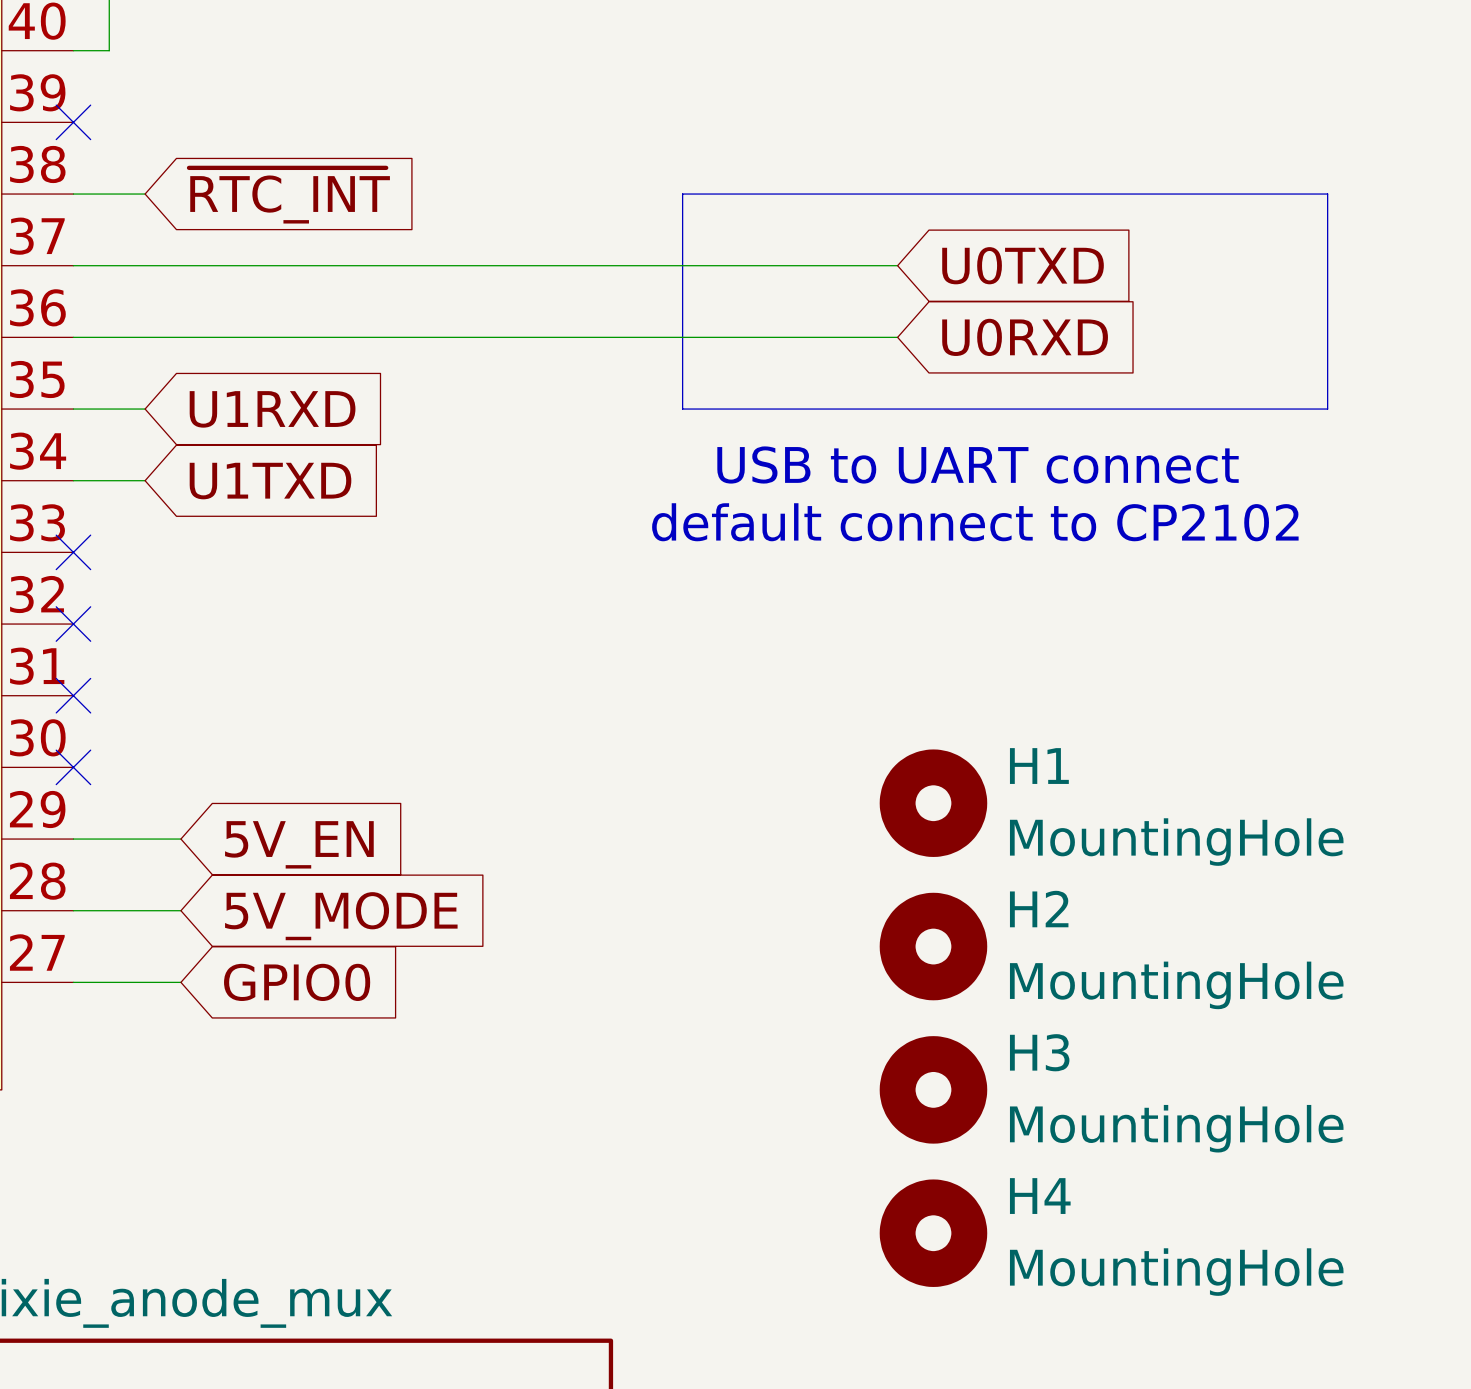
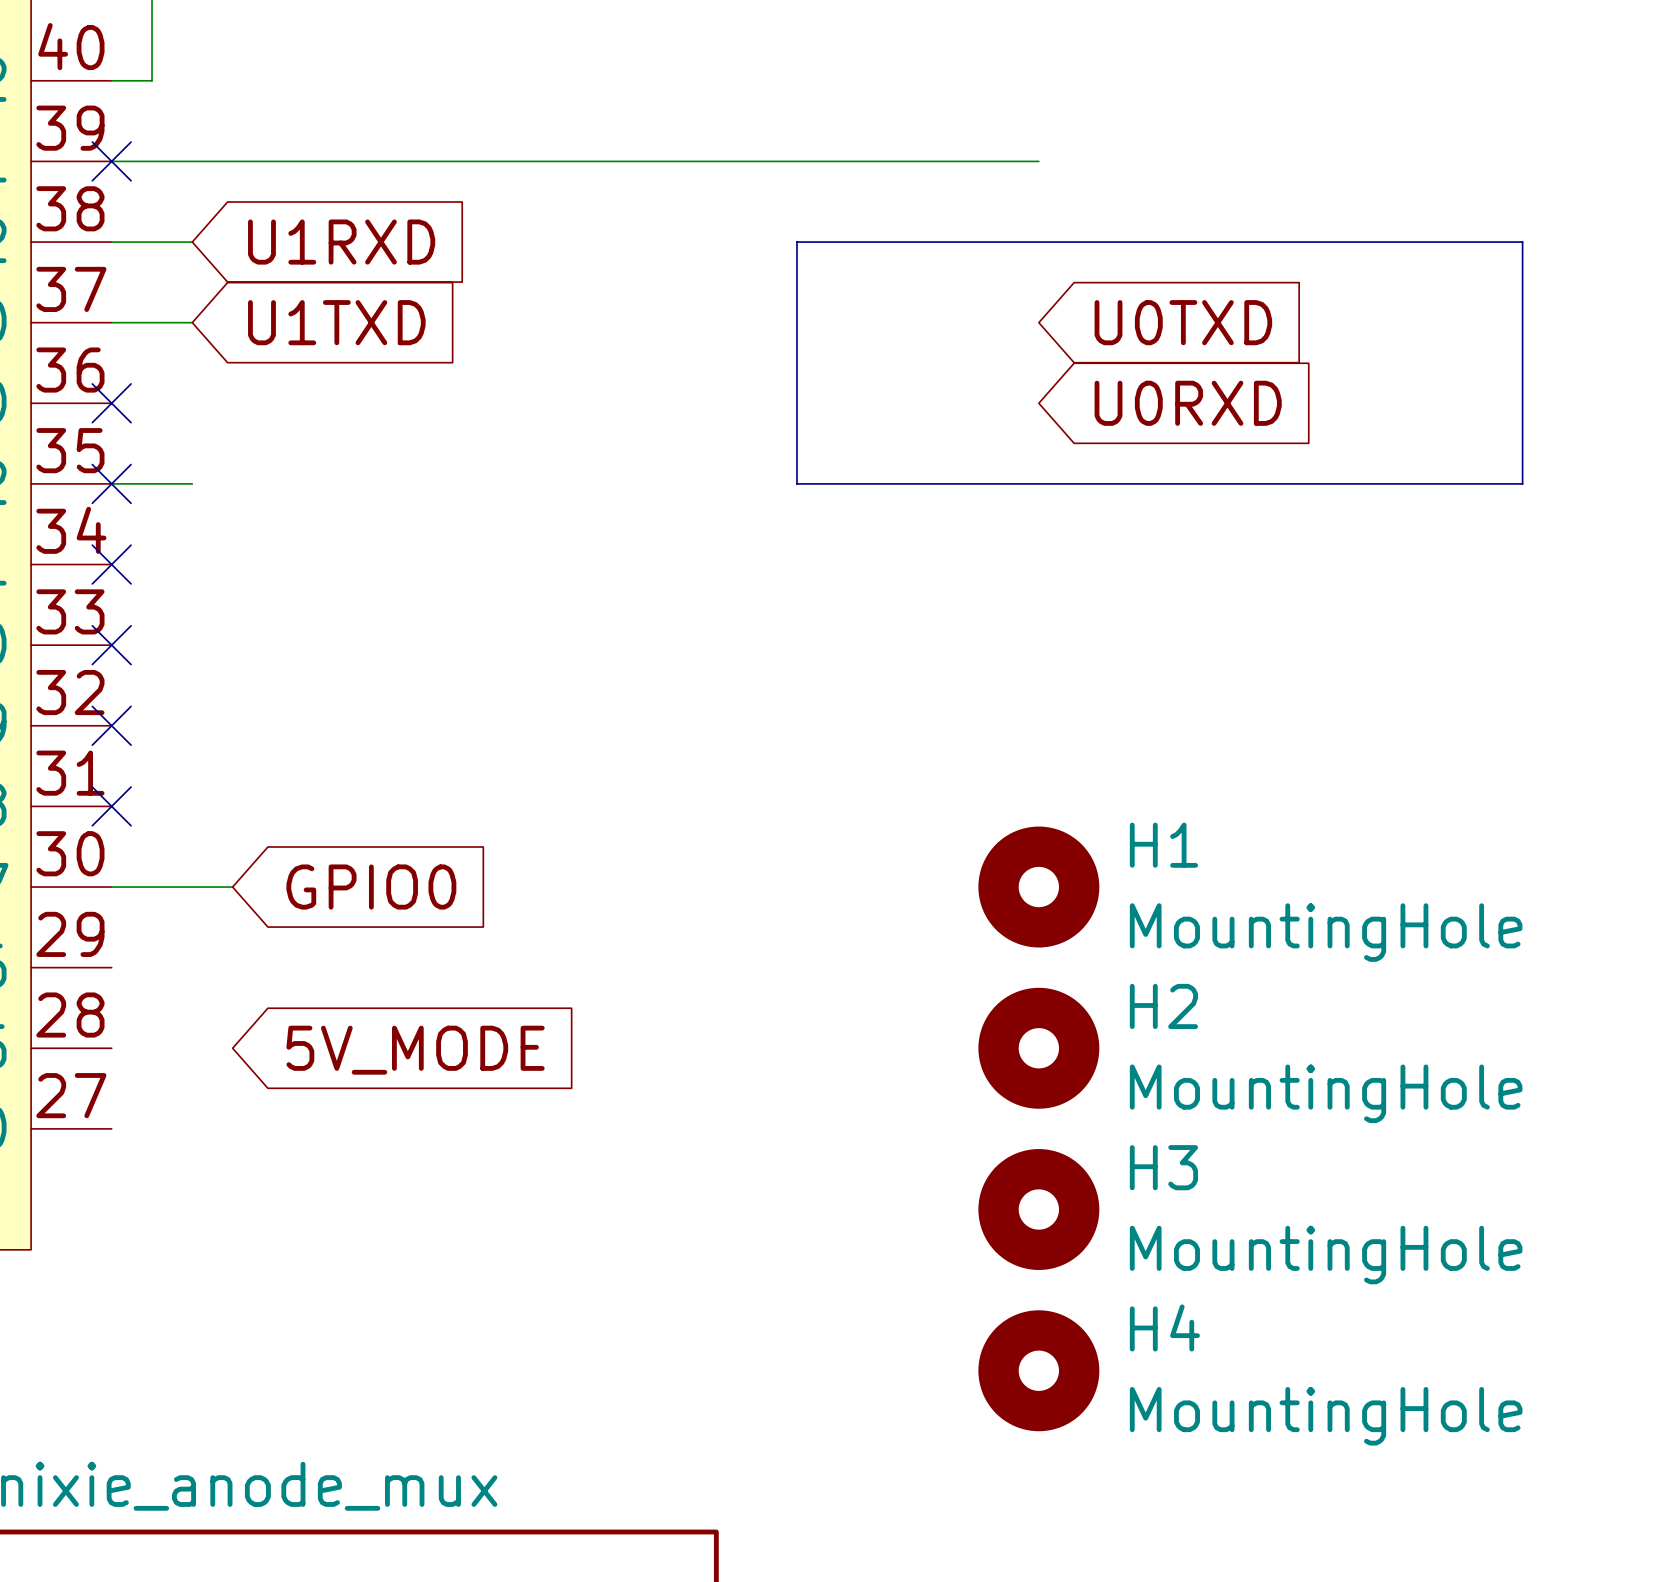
global label: ~{RTC_INT} (289, 195) -> U1RXD (341, 242)
wire: (145, 265) (897, 265) -> none
wire: (73, 337) (897, 337) -> (111, 161) (1038, 161)
no-connect mark: none -> (111, 403)
no-connect mark: none -> (111, 483)
global label: U1RXD (272, 409) -> none
text: USB to UART connect (978, 464) -> none
wire: (73, 480) (145, 480) -> none
no-connect mark: none -> (111, 564)
global label position: U1TXD (270, 481) -> U1TXD (336, 322)
text: default connect to CP2102 (975, 522) -> none
no-connect mark: (73, 767) -> none
H1 position: (933, 803) -> (1038, 887)
wire: (73, 839) (180, 839) -> none
global label: 5V_EN (299, 844) -> none
wire: (73, 910) (180, 910) -> none
H2 position: (933, 946) -> (1038, 1048)
wire: (73, 982) (180, 982) -> (111, 887) (232, 887)
global label position: GPIO0 (297, 982) -> GPIO0 (371, 887)
H3 position: (933, 1089) -> (1038, 1209)
H4 position: (933, 1233) -> (1038, 1370)

